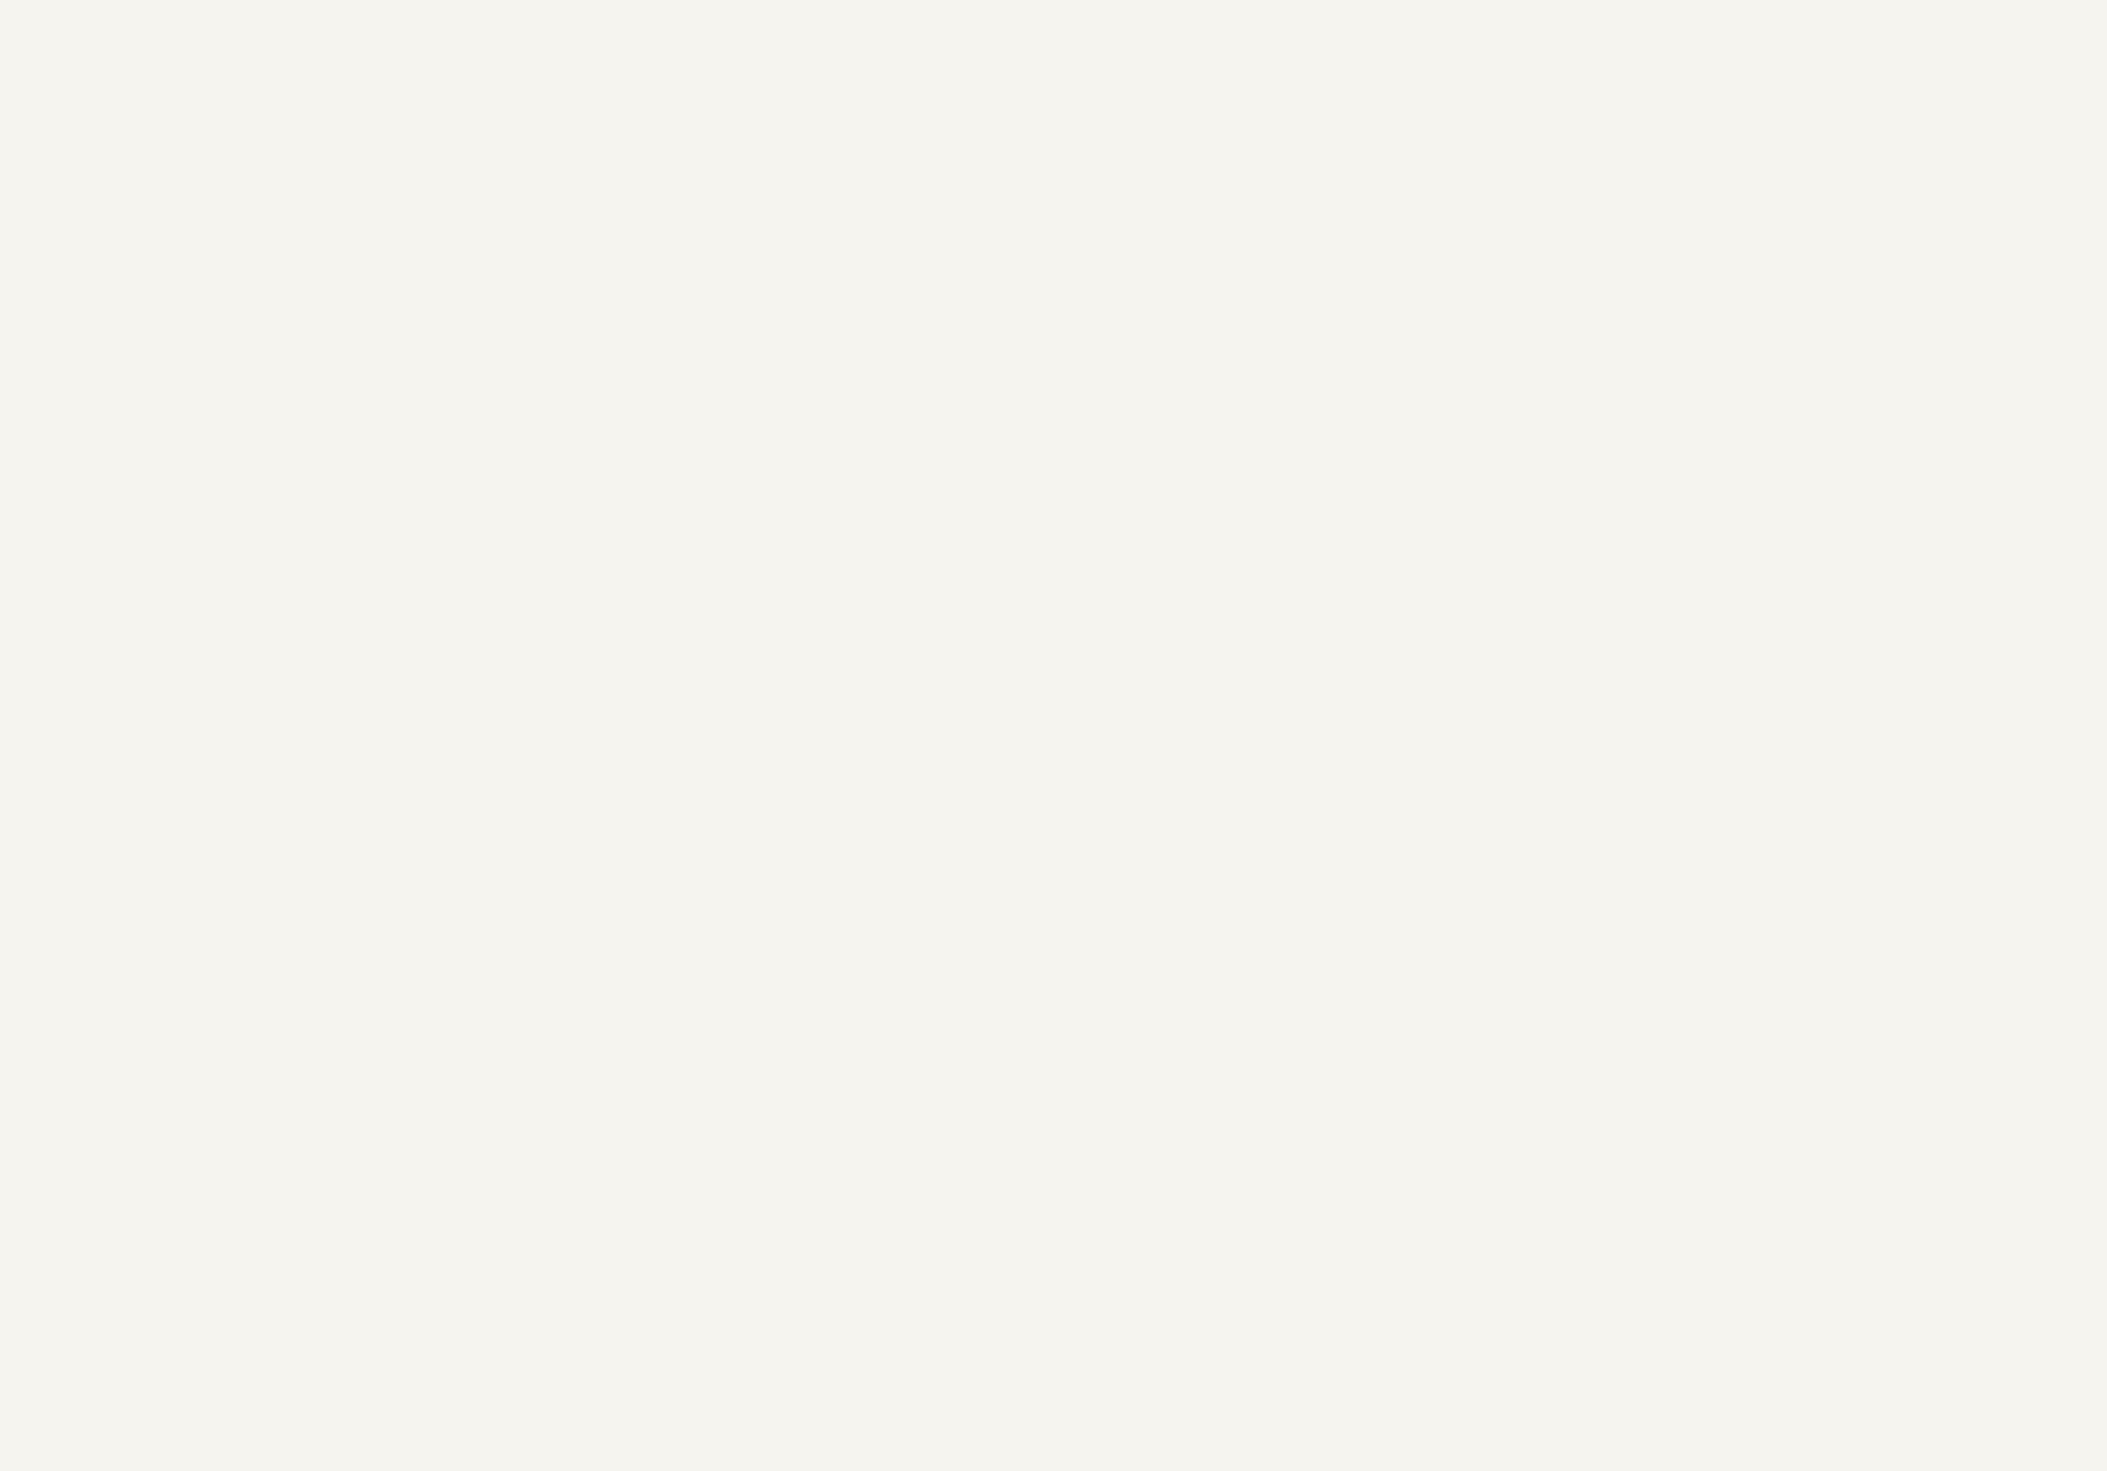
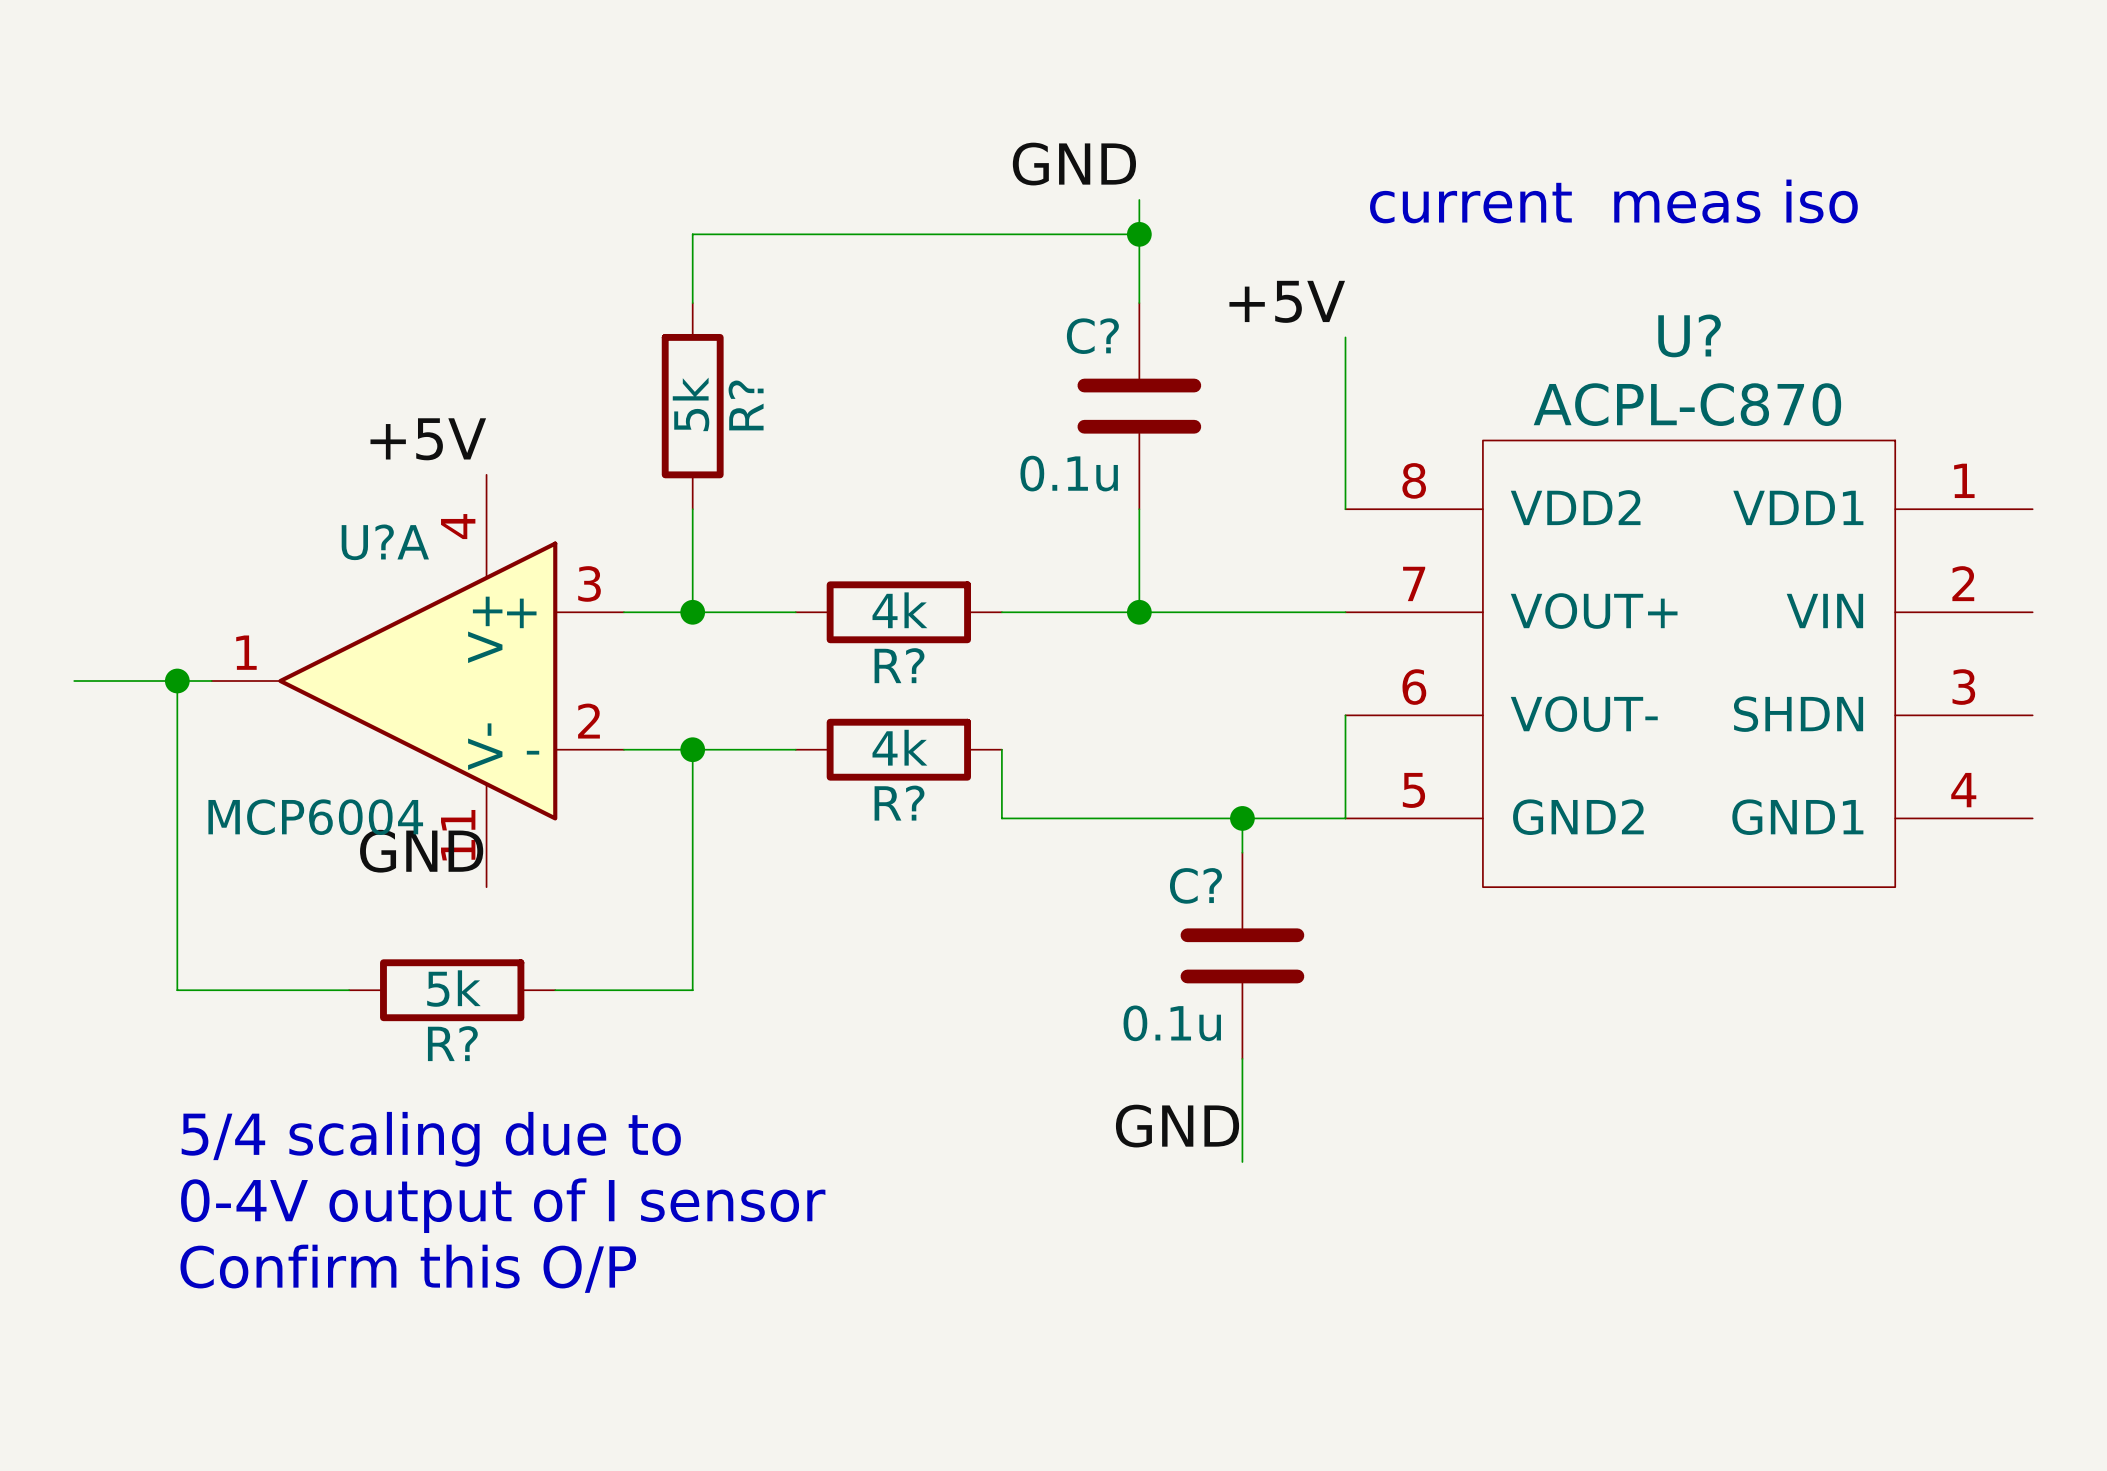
label: none -> GND (1074, 164)
wire: none -> (1139, 199) (1139, 303)
text: none -> current meas iso (1613, 201)
wire: none -> (1139, 234) (692, 234) (692, 303)
junction: none -> (1139, 234)
label: none -> +5V (1287, 301)
wire: none -> (1345, 337) (1345, 509)
R?: none -> 5k (692, 406)
C?: none -> 0.1u (1139, 406)
label: none -> +5V (428, 439)
wire: none -> (692, 509) (692, 612)
wire: none -> (1139, 509) (1139, 612)
wire: none -> (623, 612) (795, 612)
junction: none -> (692, 612)
R?: none -> 4k (898, 612)
wire: none -> (1001, 612) (1345, 612)
junction: none -> (1139, 612)
U?: none -> ACPL-C870 (1689, 663)
wire: none -> (74, 681) (211, 681)
wire: none -> (177, 681) (177, 990) (349, 990)
junction: none -> (177, 681)
U?A: none -> MCP6004 (417, 681)
wire: none -> (1345, 715) (1345, 818) (1001, 818) (1001, 749)
wire: none -> (623, 749) (795, 749)
wire: none -> (692, 749) (692, 990) (555, 990)
junction: none -> (692, 749)
R?: none -> 4k (898, 749)
wire: none -> (1242, 818) (1242, 852)
junction: none -> (1242, 818)
label: none -> GND (421, 851)
C?: none -> 0.1u (1242, 955)
R?: none -> 5k (452, 990)
wire: none -> (1242, 1058) (1242, 1162)
label: none -> GND (1177, 1126)
text: none -> 5/4 scaling due to (431, 1139)
text: none -> 0-4V output of I sensor (503, 1205)
text: none -> Confirm this O/P (408, 1268)

